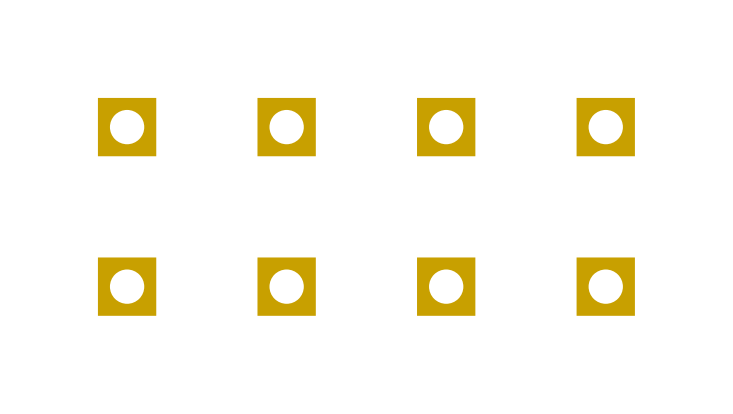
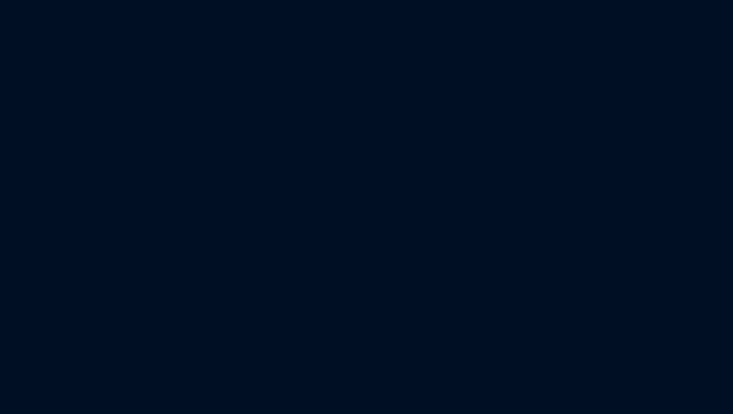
part: (127, 127) -> none
part: (286, 127) -> none
part: (446, 127) -> none
part: (605, 127) -> none
part: (127, 286) -> none
part: (286, 286) -> none
part: (446, 286) -> none
part: (605, 286) -> none

